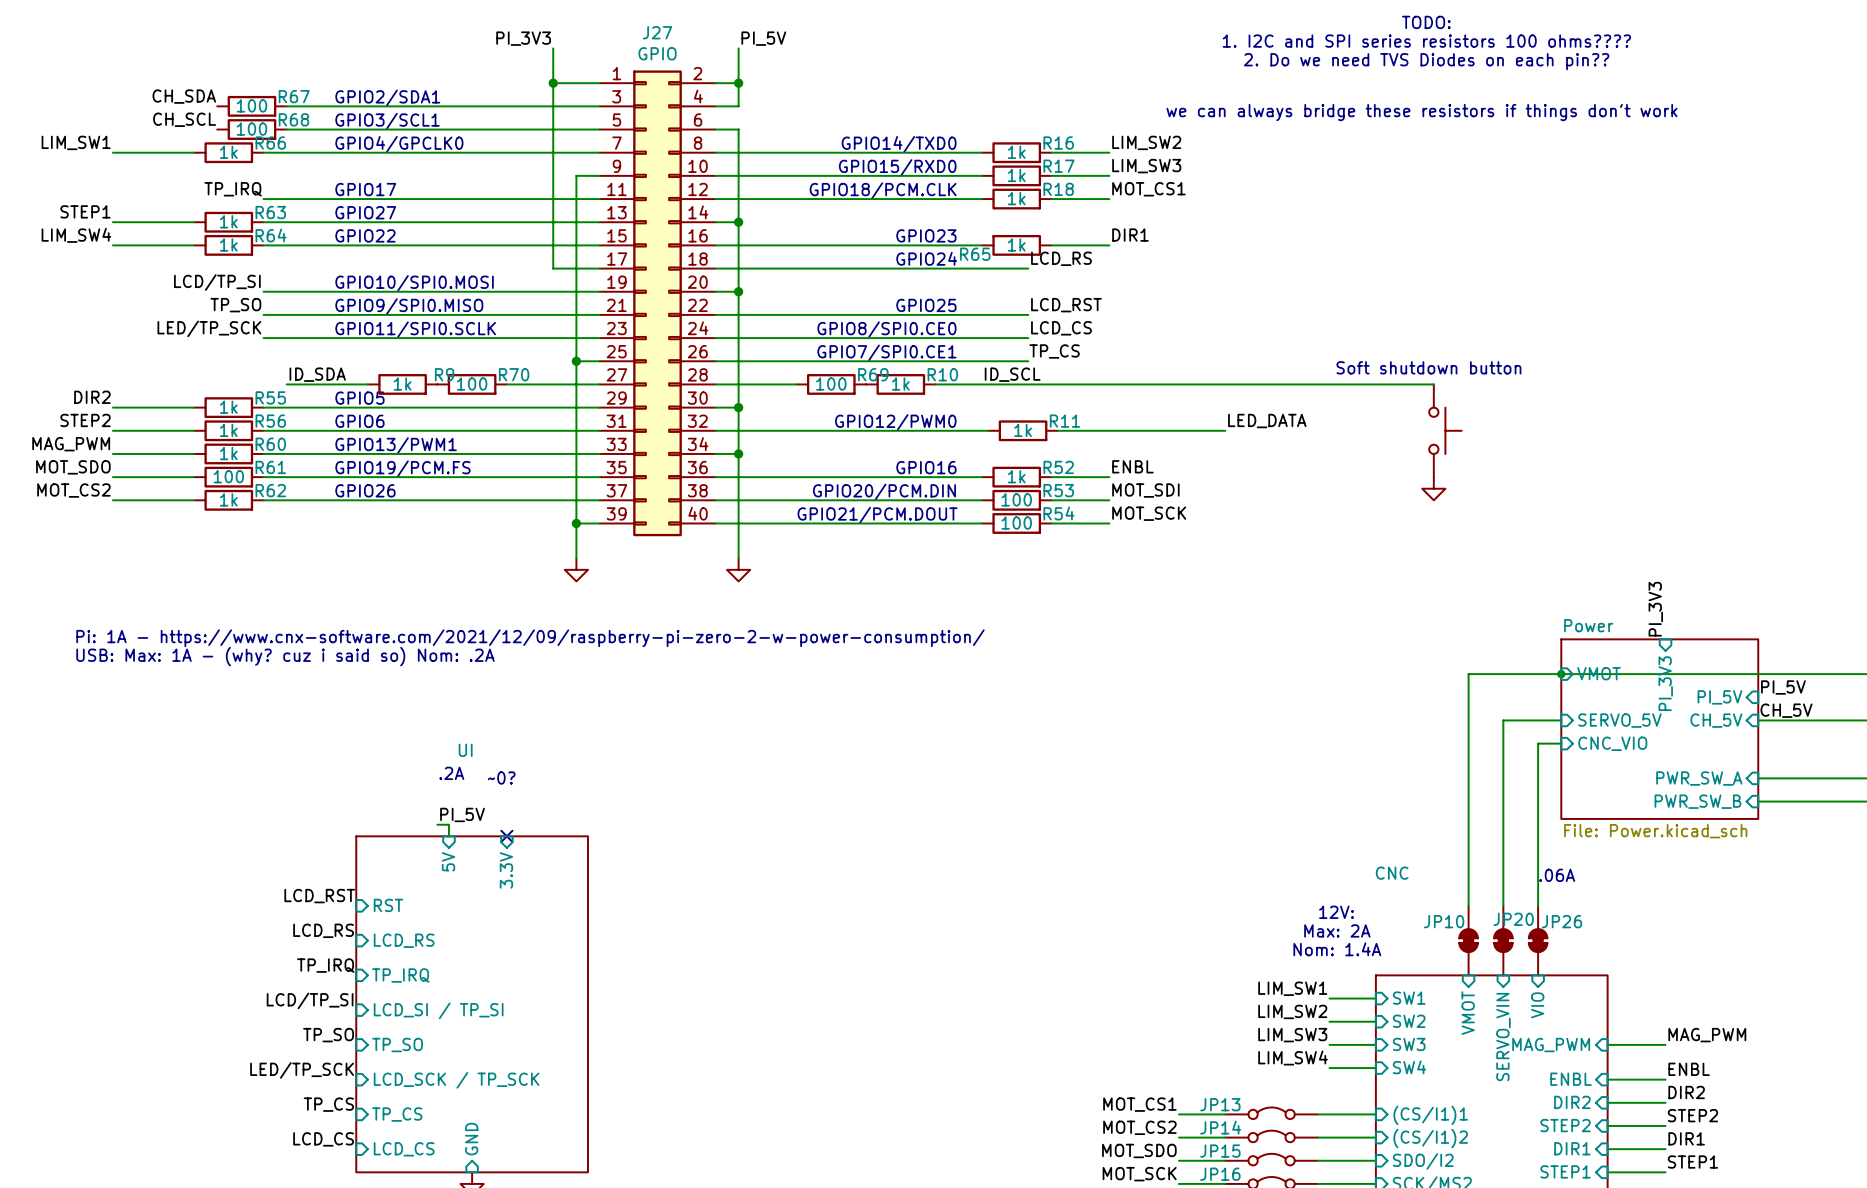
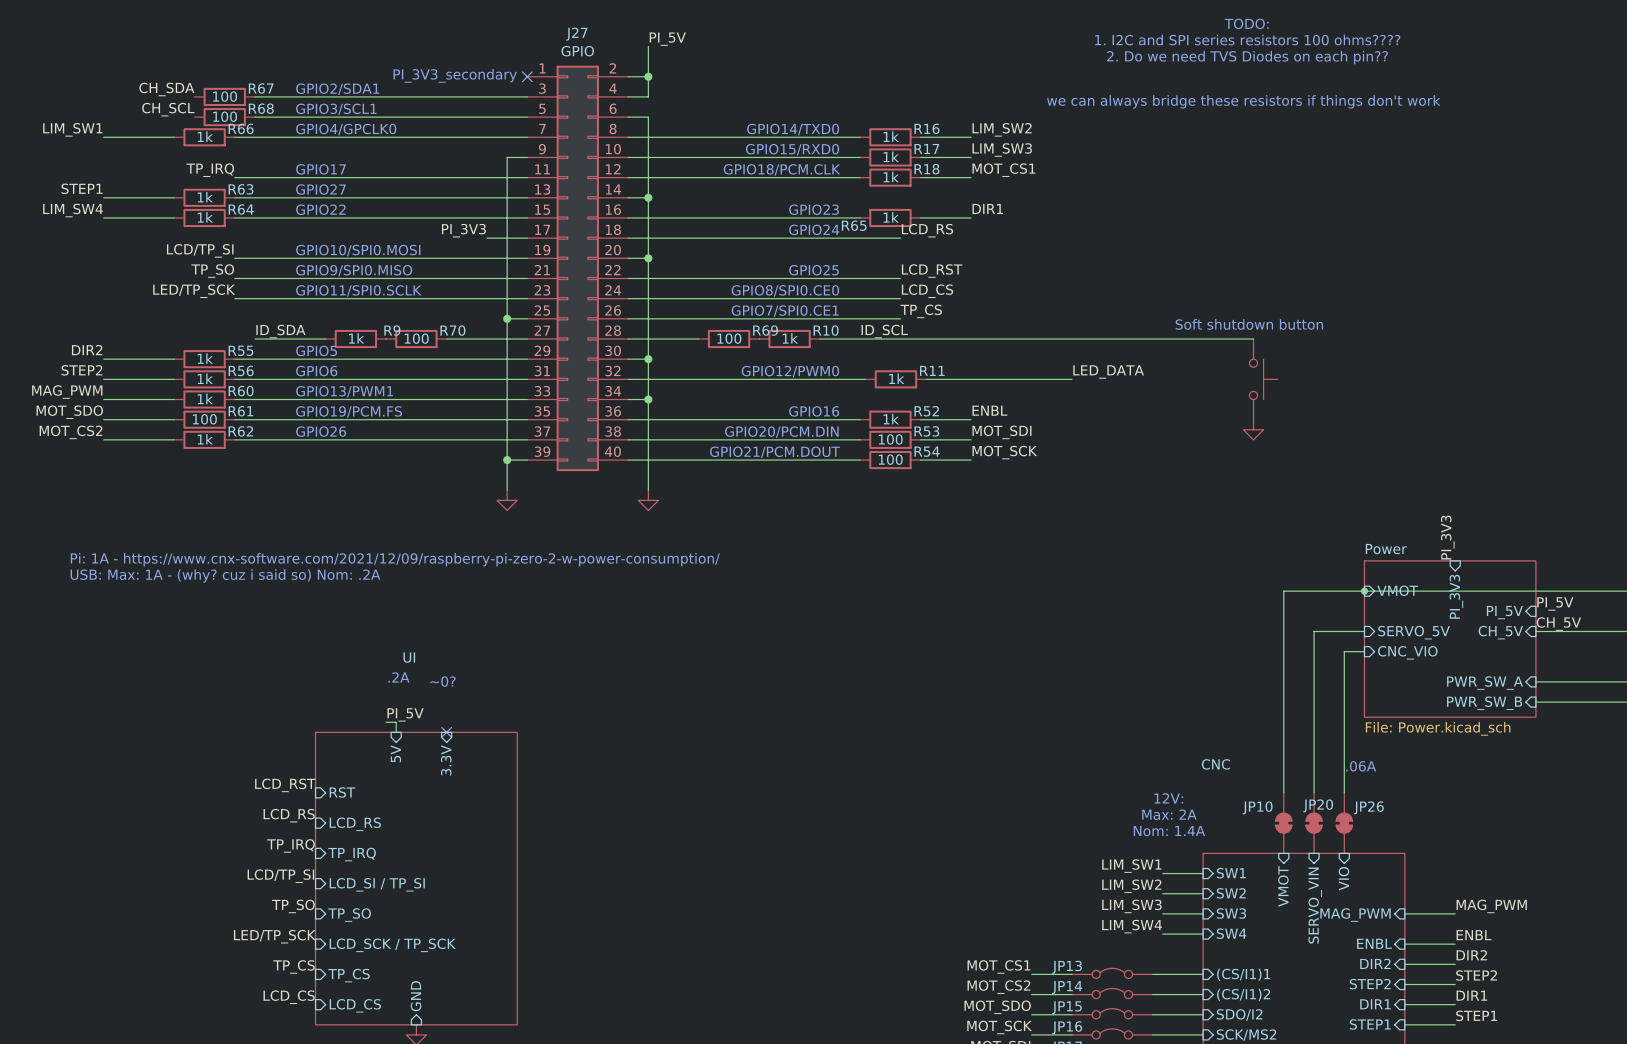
label position: PI_3V3 (523, 38) -> PI_3V3 (463, 230)
wire: (553, 48) (553, 268) -> none
text: none -> PI_3V3_secondary (455, 75)
wire: (553, 83) (599, 83) -> none
junction: (553, 83) -> none
no-connect mark: none -> (527, 76)

